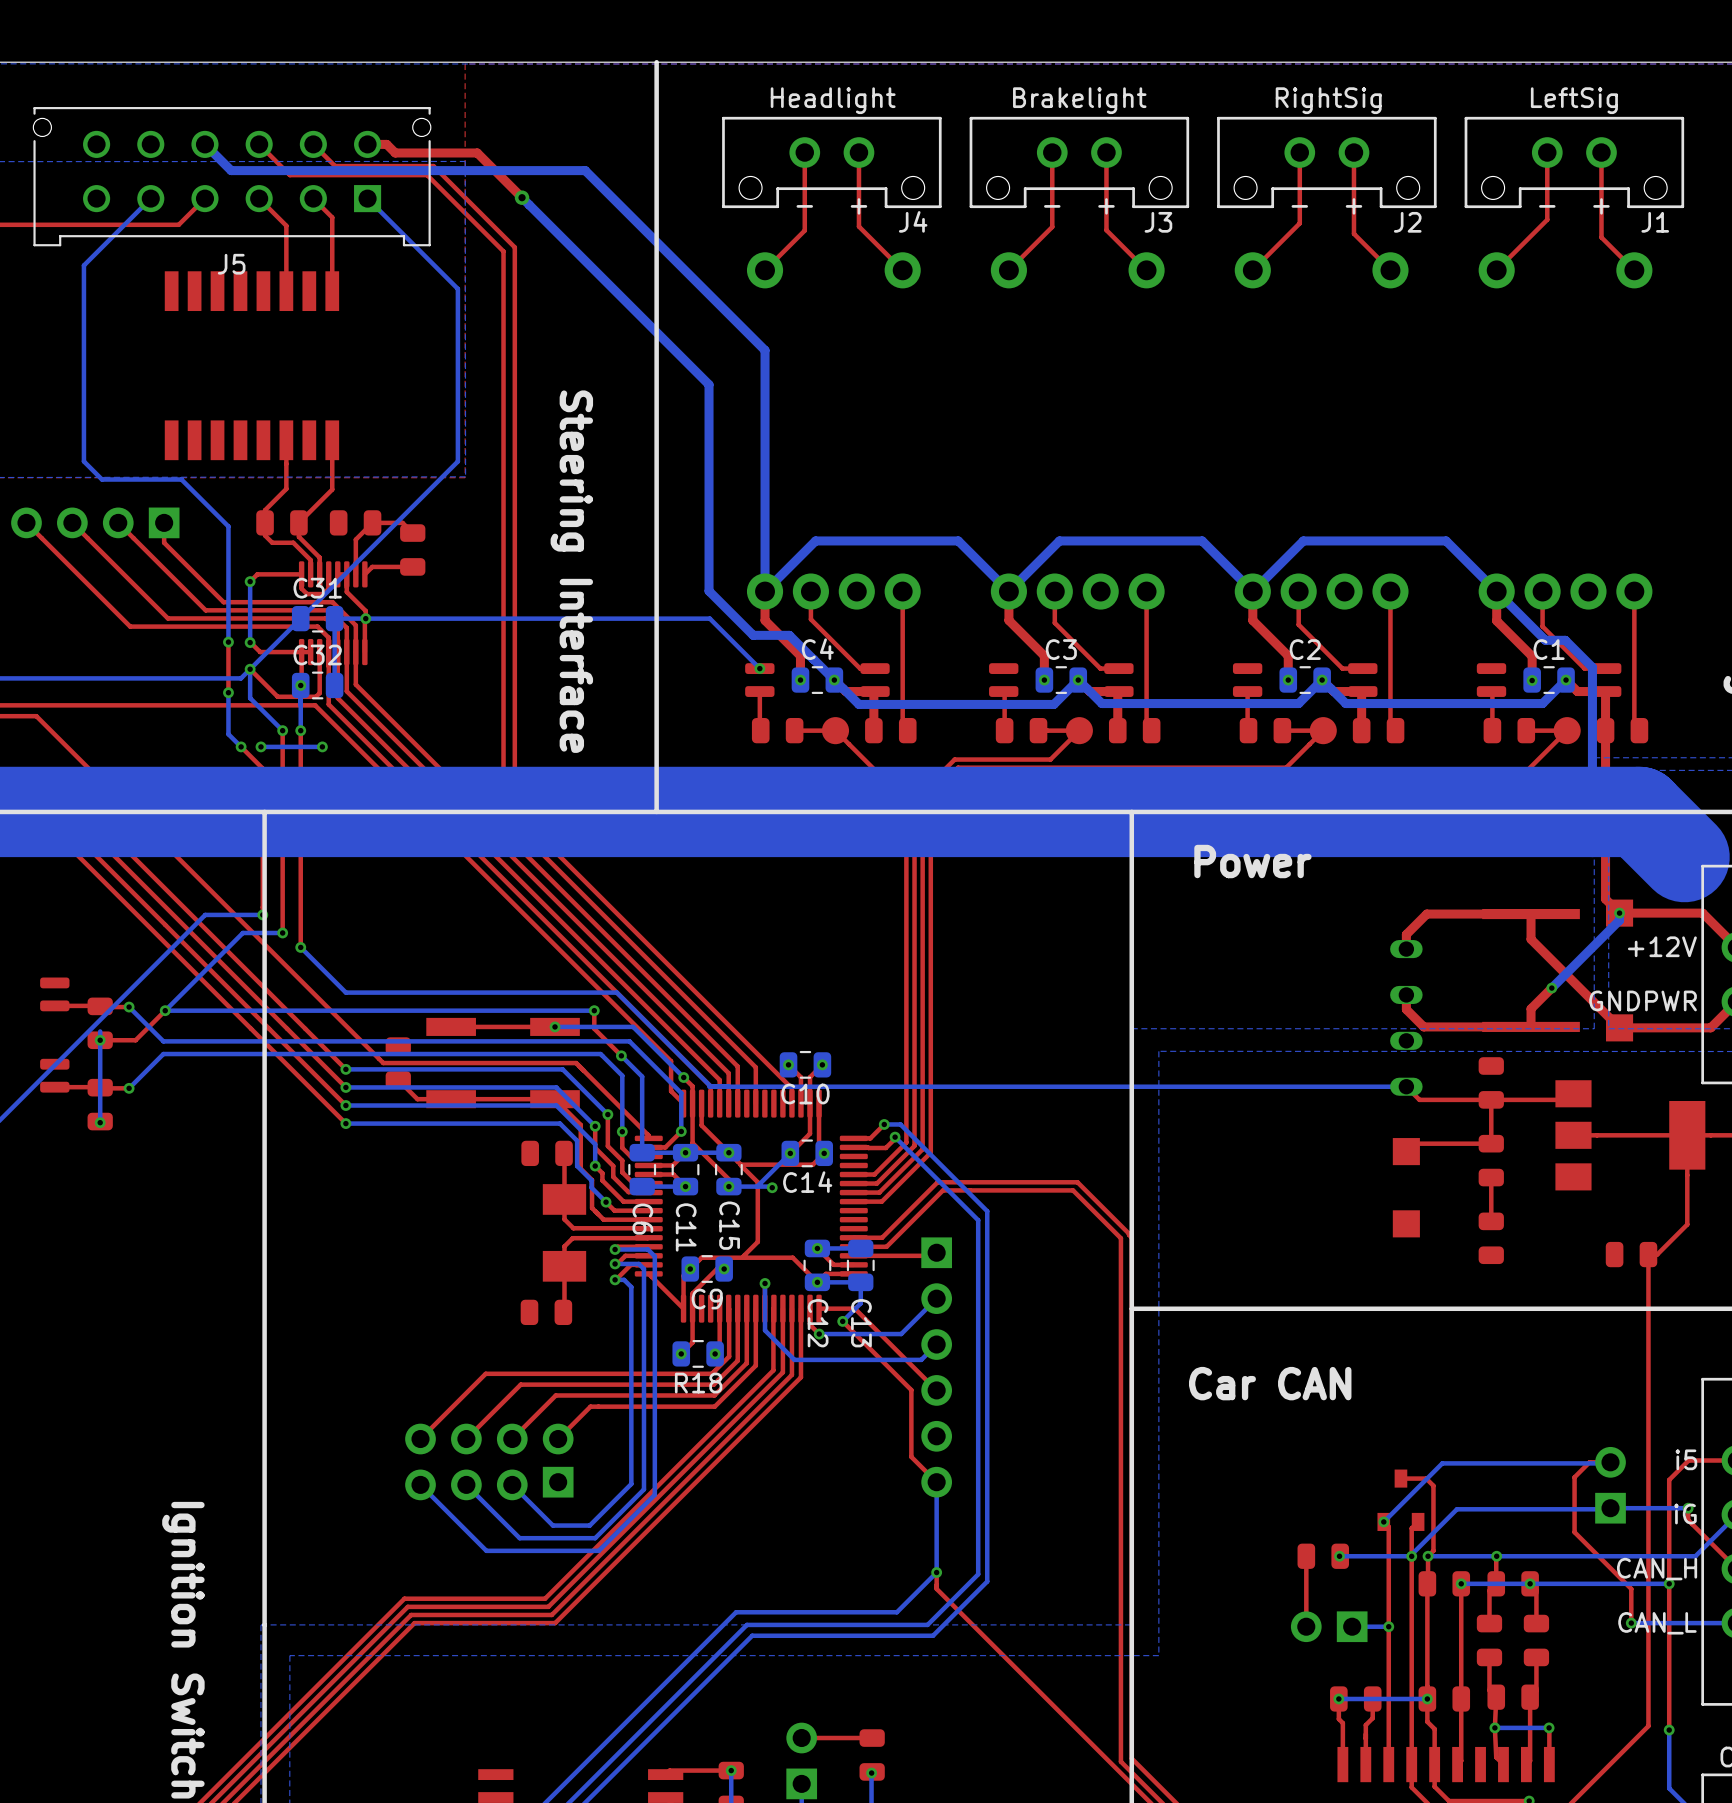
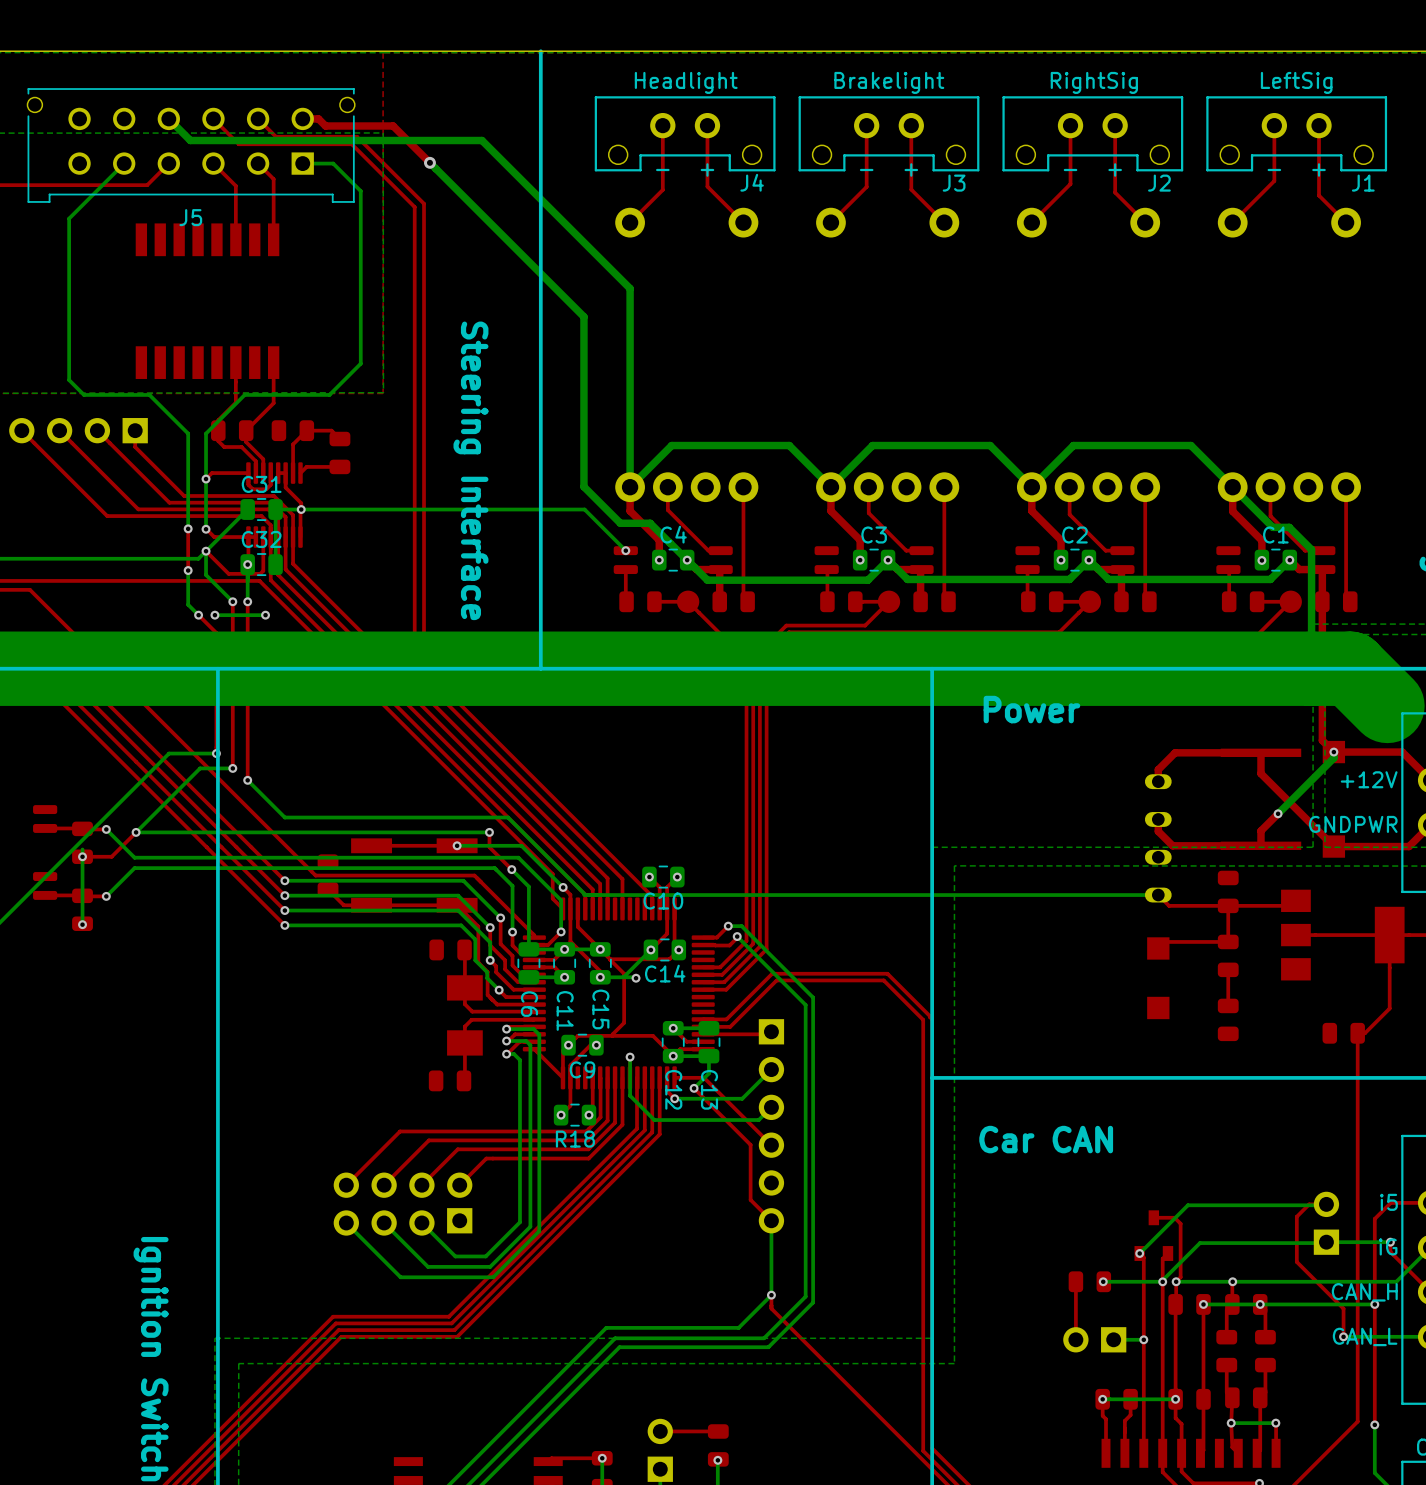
bottom track: (367, 198) (457, 288) (457, 461) (300, 618) -> (302, 163) (333, 163) (360, 191) (360, 363) (329, 394) (244, 394) (206, 433) (206, 479)

